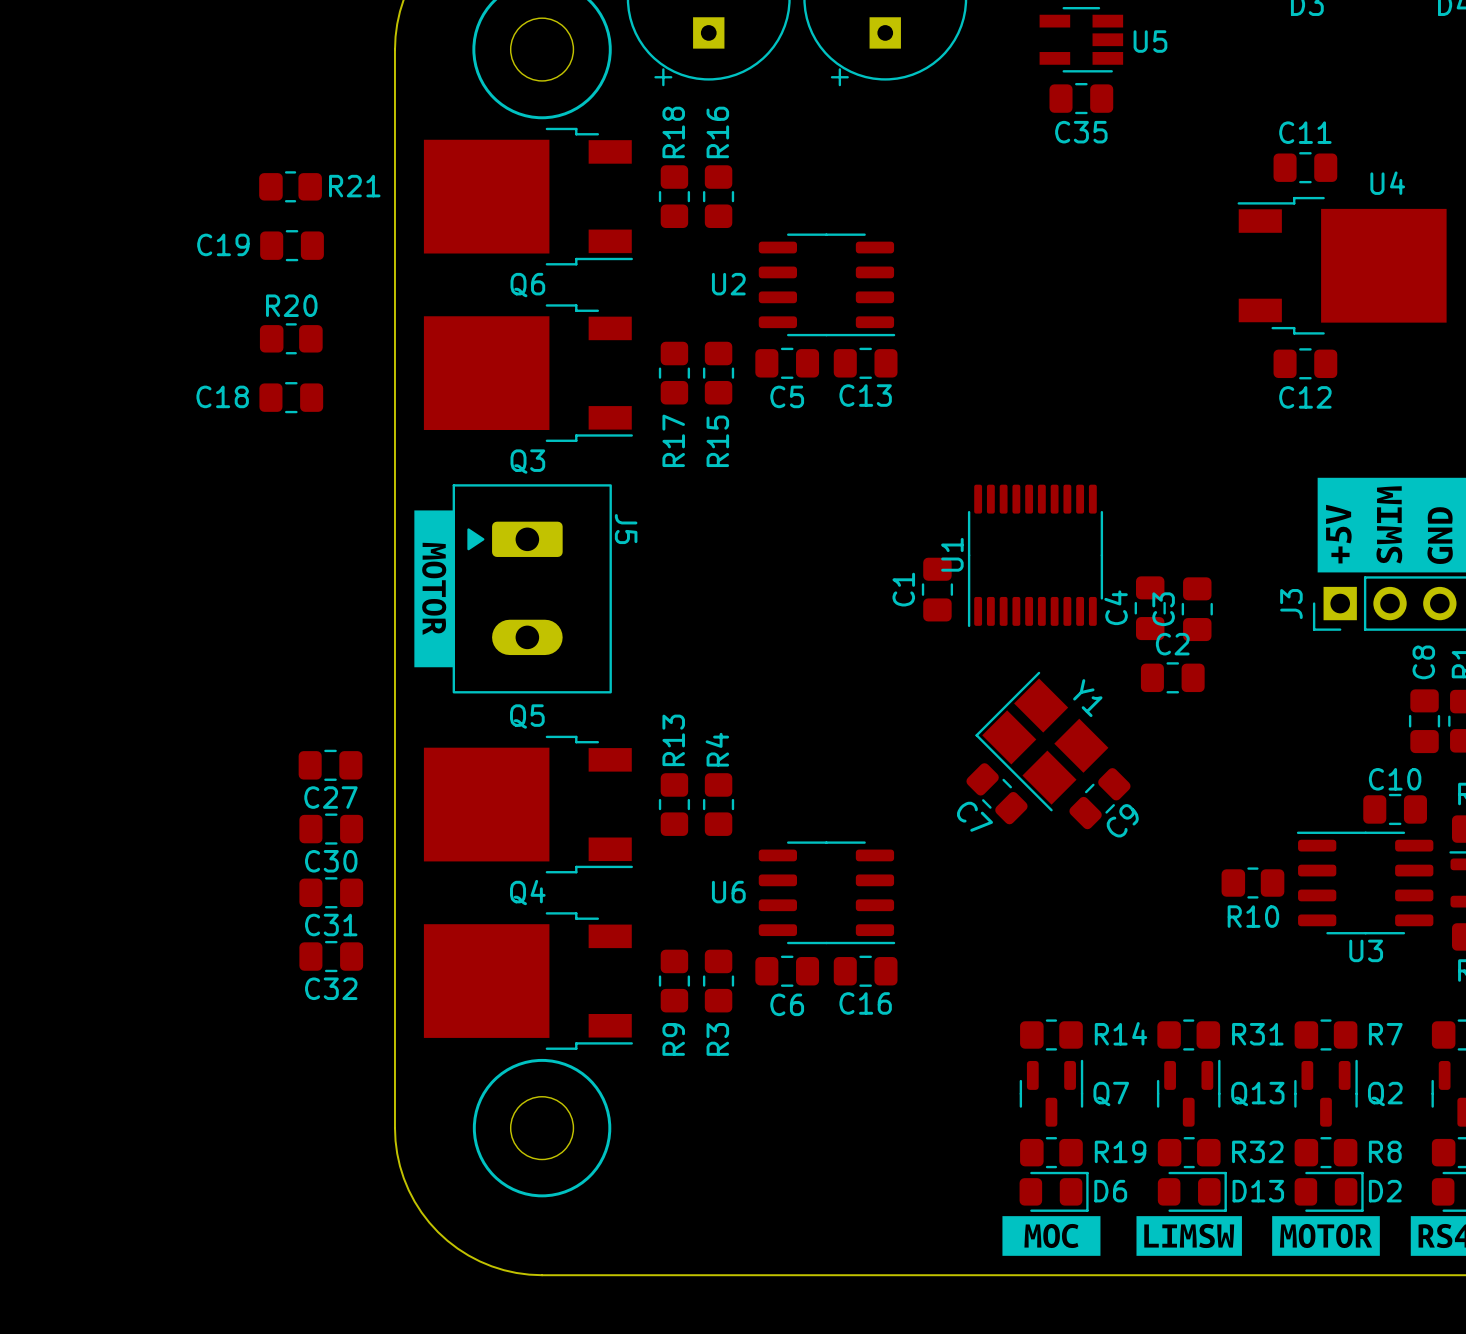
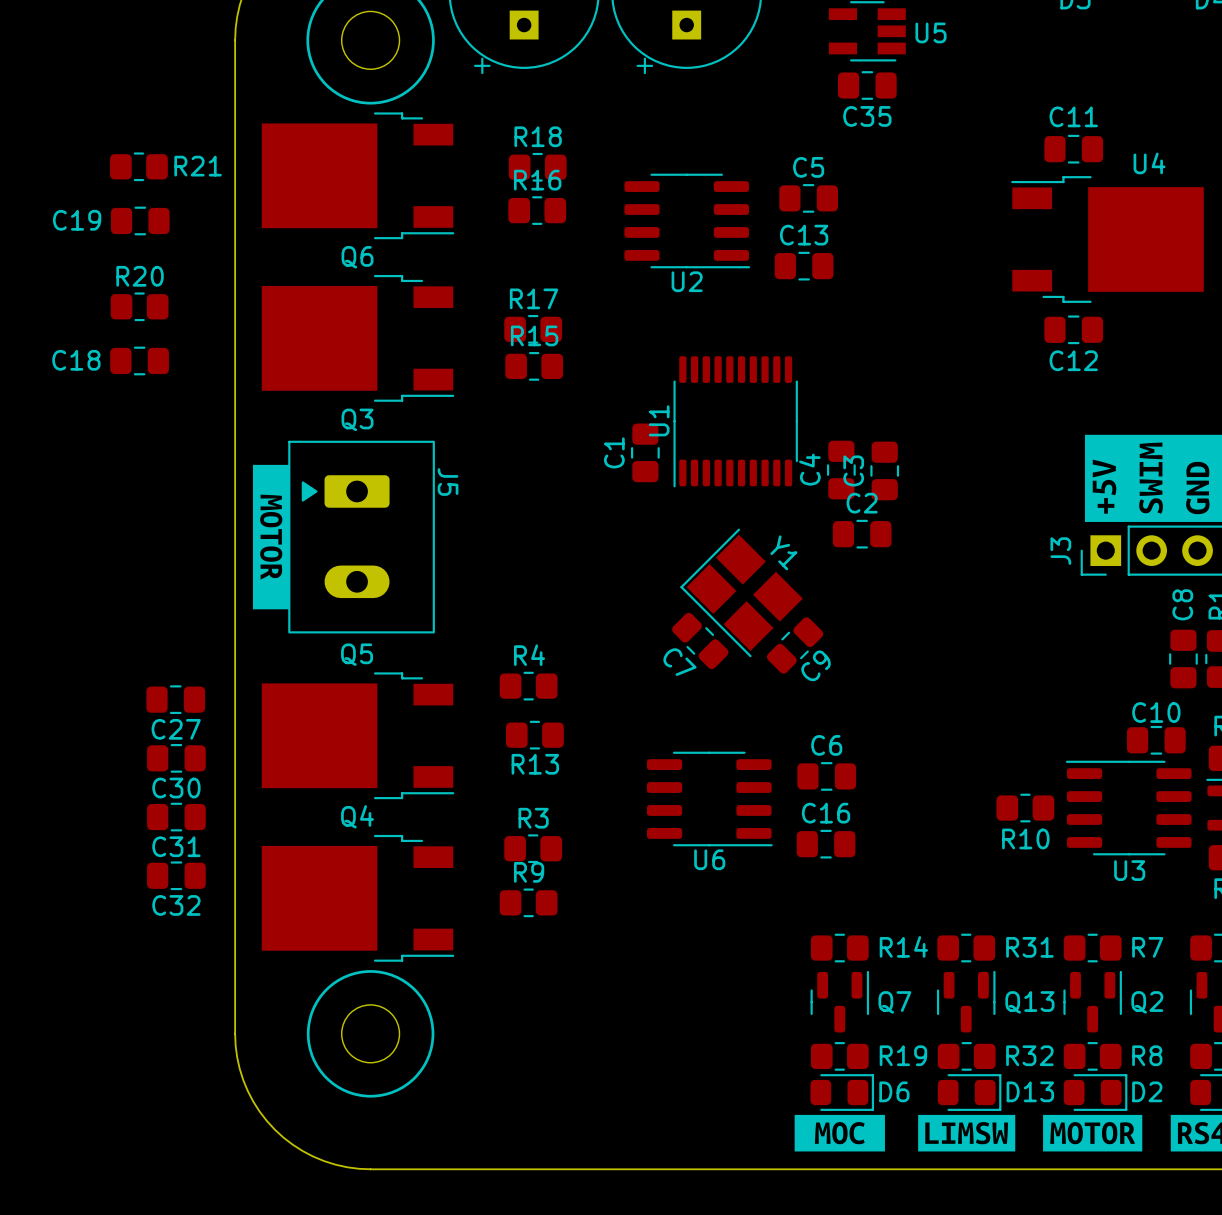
R18 rotation: 0° (674, 196) -> 90° clockwise (537, 167)
R18 position: (674, 196) -> (537, 167)
R16 rotation: 0° (718, 196) -> 90° clockwise (537, 210)
R16 position: (718, 196) -> (537, 210)
U2 name position: U2 (728, 284) -> U2 (687, 281)
U2 position: (827, 284) -> (687, 220)
C5 position: (787, 363) -> (808, 198)
C13 position: (865, 363) -> (804, 266)
R17 rotation: 0° (674, 373) -> 90° clockwise (533, 329)
R17 position: (674, 373) -> (533, 329)
R15 rotation: 0° (718, 373) -> 90° clockwise (534, 366)
C13 name position: C13 (865, 395) -> C13 (804, 235)
C5 name position: C5 (787, 396) -> C5 (808, 167)
R17 name position: R17 (673, 440) -> R17 (534, 298)
R15 name position: R15 (717, 441) -> R15 (534, 335)
U1 position: (1035, 555) -> (735, 421)
C1 position: (937, 589) -> (645, 452)
C4 position: (1150, 608) -> (841, 470)
C3 position: (1197, 609) -> (884, 470)
C2 position: (1172, 677) -> (862, 534)
R13 name position: R13 (673, 740) -> R13 (535, 764)
Y1 position: (1041, 741) -> (741, 592)
C7 position: (997, 793) -> (700, 640)
C9 position: (1099, 798) -> (795, 645)
R13 rotation: 0° (674, 804) -> 90° clockwise (534, 735)
R13 position: (674, 804) -> (534, 735)
R4 rotation: 0° (718, 804) -> 90° clockwise (528, 686)
R4 position: (718, 804) -> (528, 686)
U6 name position: U6 (728, 892) -> U6 (709, 859)
U6 position: (827, 892) -> (709, 799)
C6 position: (787, 971) -> (826, 776)
C16 position: (865, 971) -> (826, 844)
R9 rotation: 0° (674, 981) -> 90° clockwise (528, 902)
R9 position: (674, 981) -> (528, 902)
R3 rotation: 0° (718, 981) -> 90° clockwise (533, 848)
R3 position: (718, 981) -> (533, 848)
C16 name position: C16 (865, 1003) -> C16 (826, 813)
C6 name position: C6 (787, 1004) -> C6 (826, 745)
R9 name position: R9 (673, 1039) -> R9 (529, 872)
R3 name position: R3 (717, 1039) -> R3 (533, 818)

